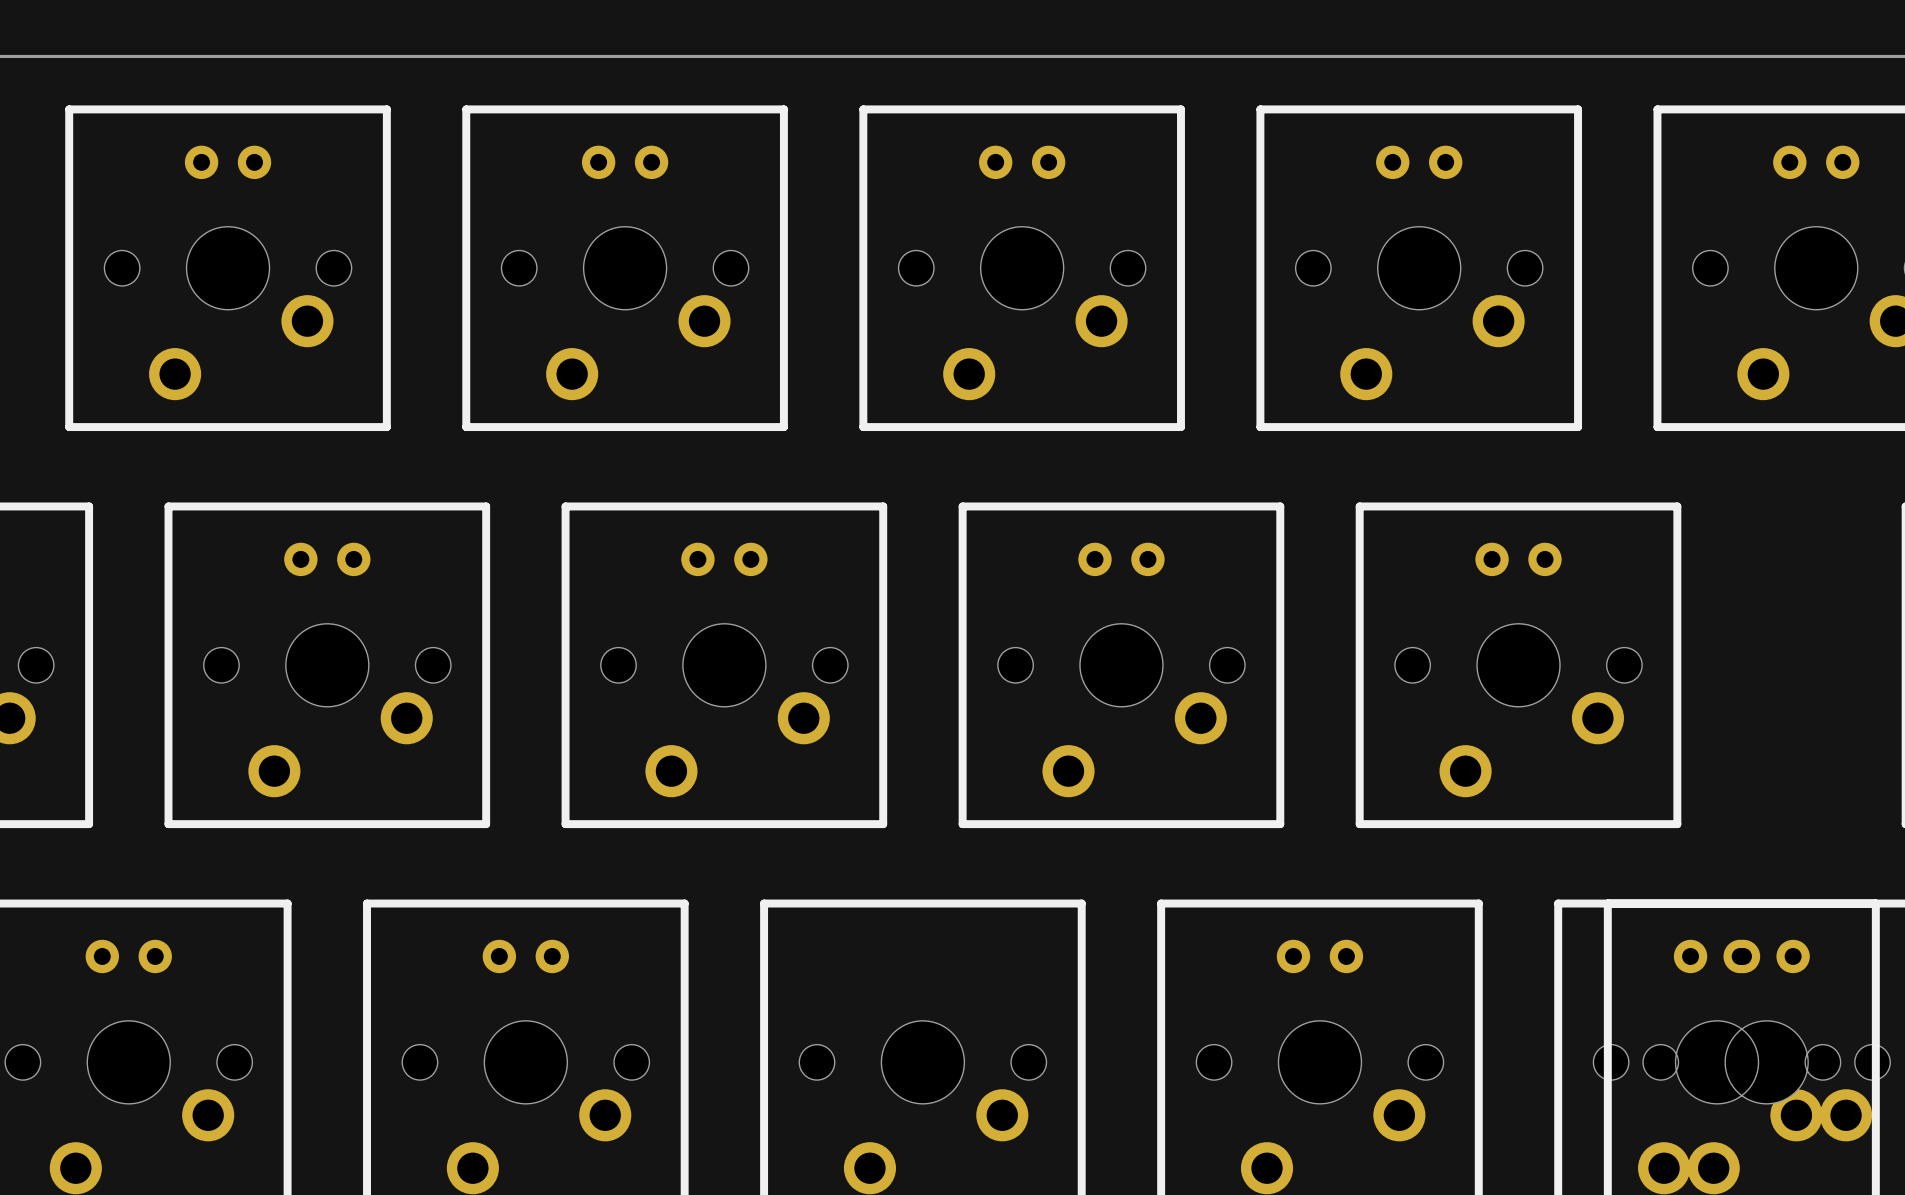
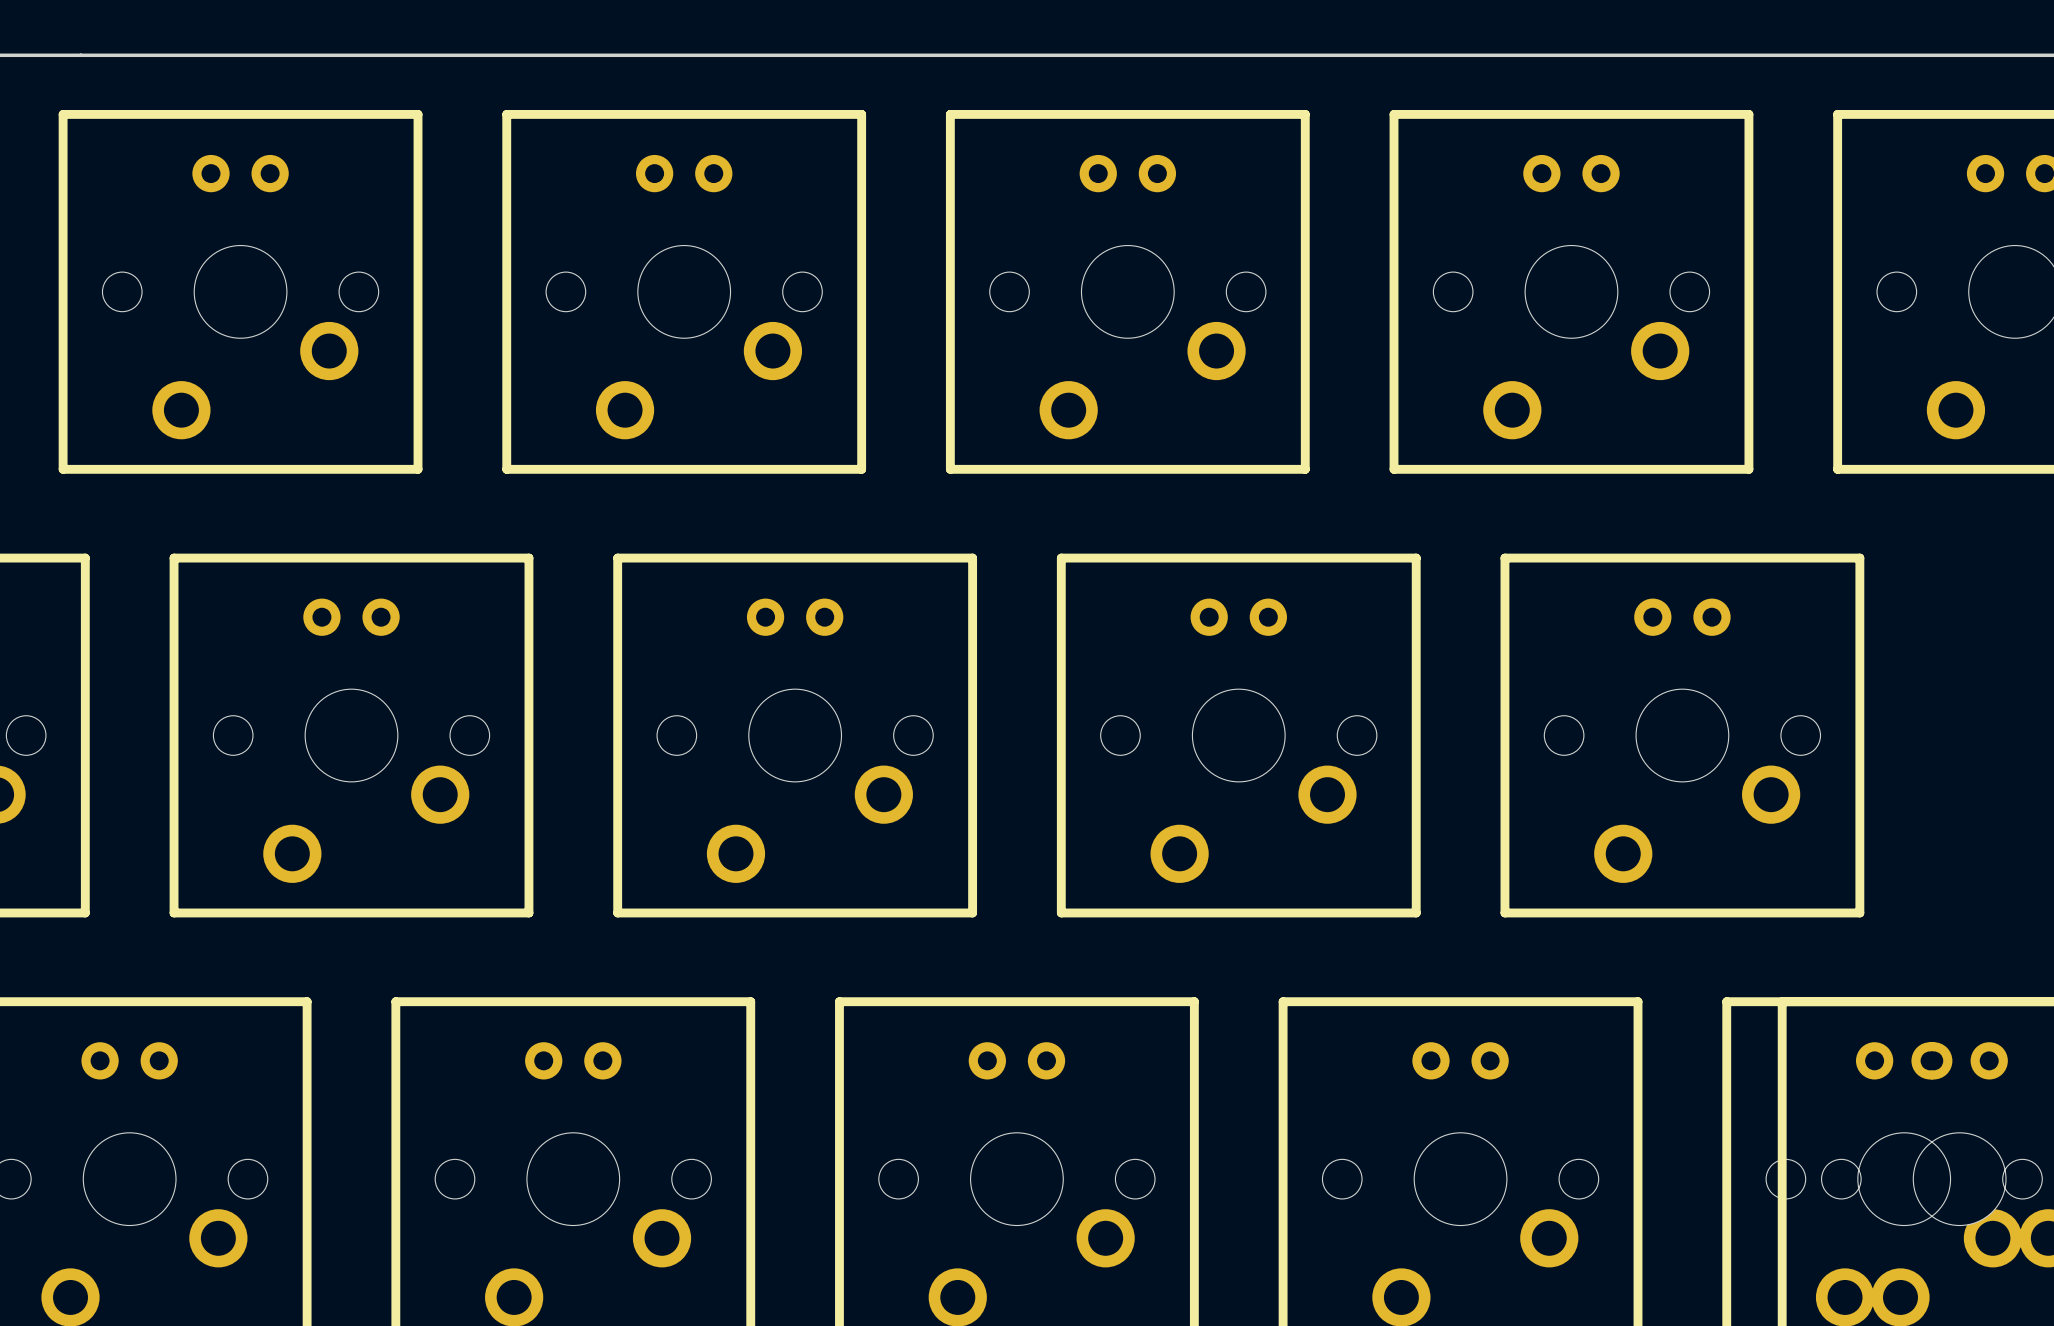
part: none -> (1016, 1060)

